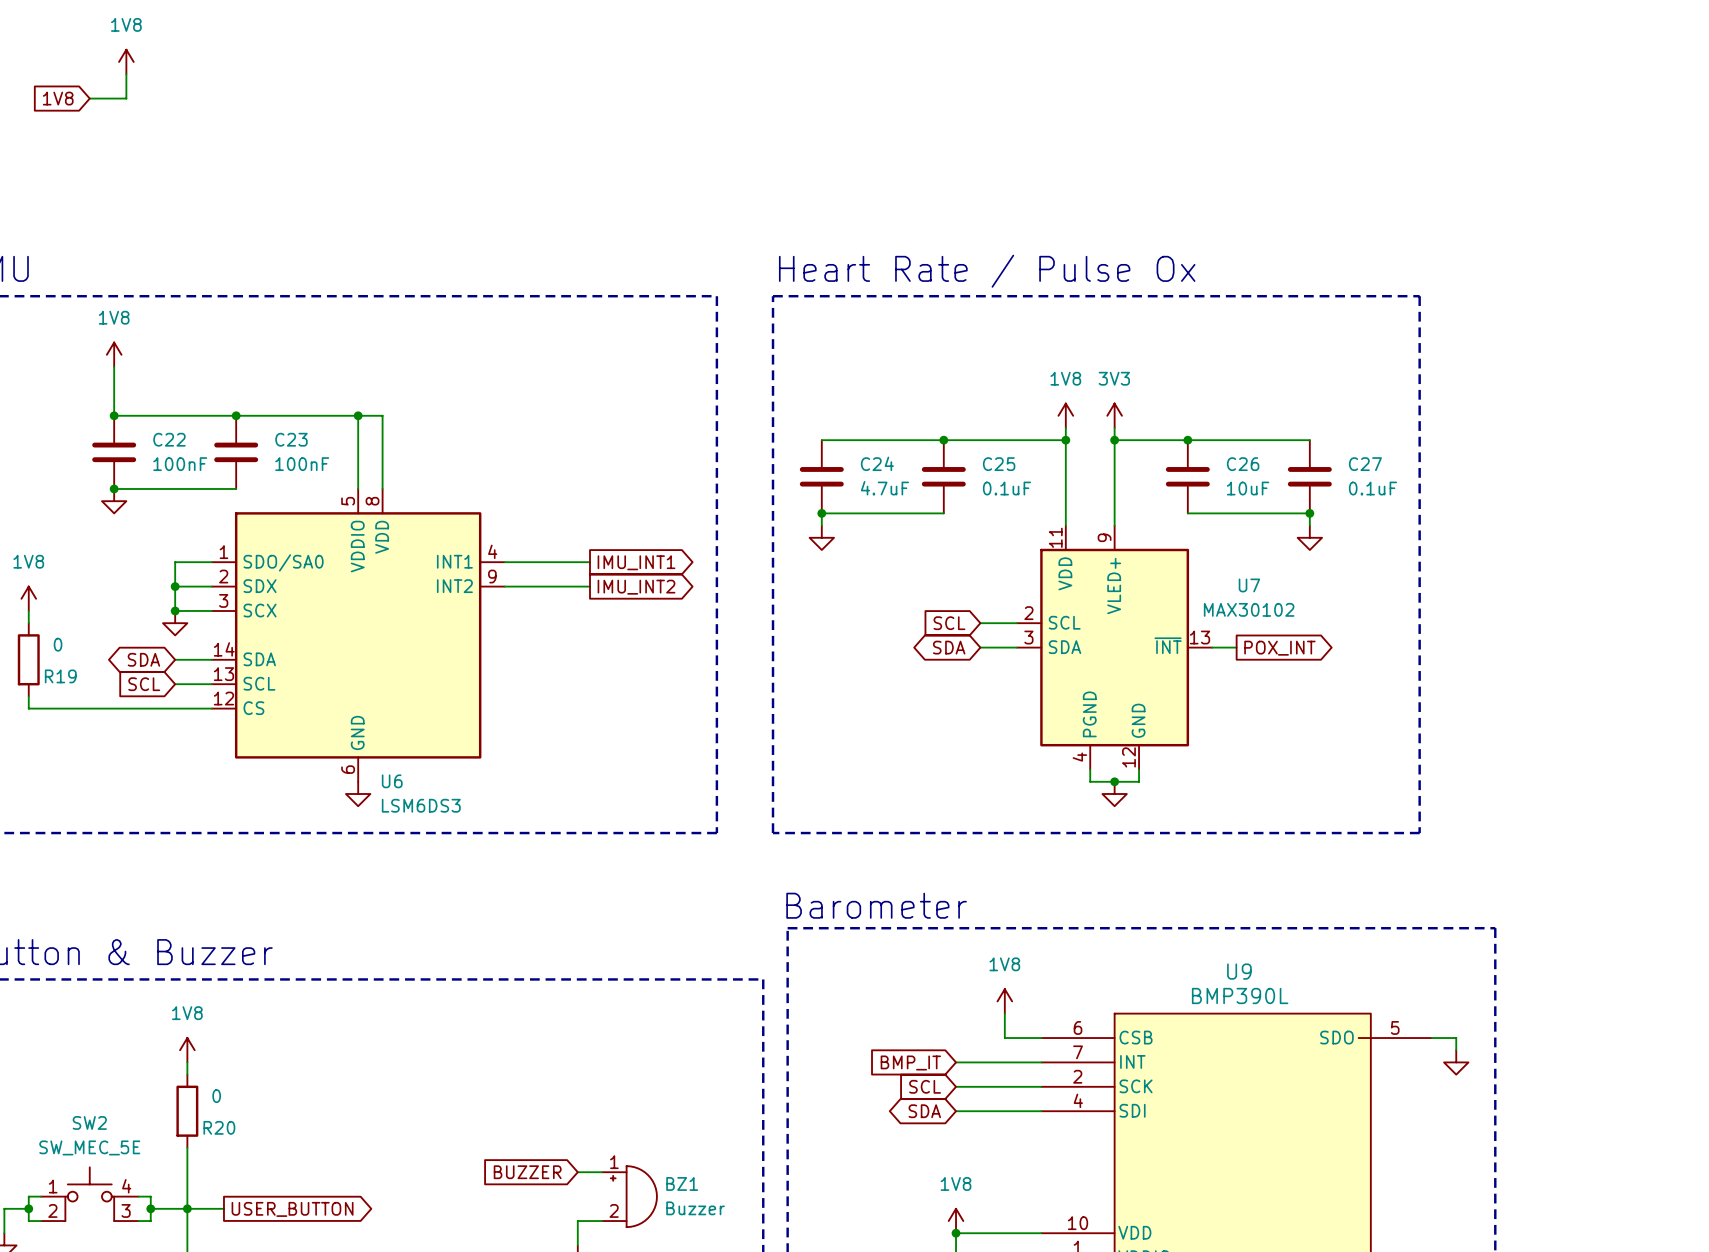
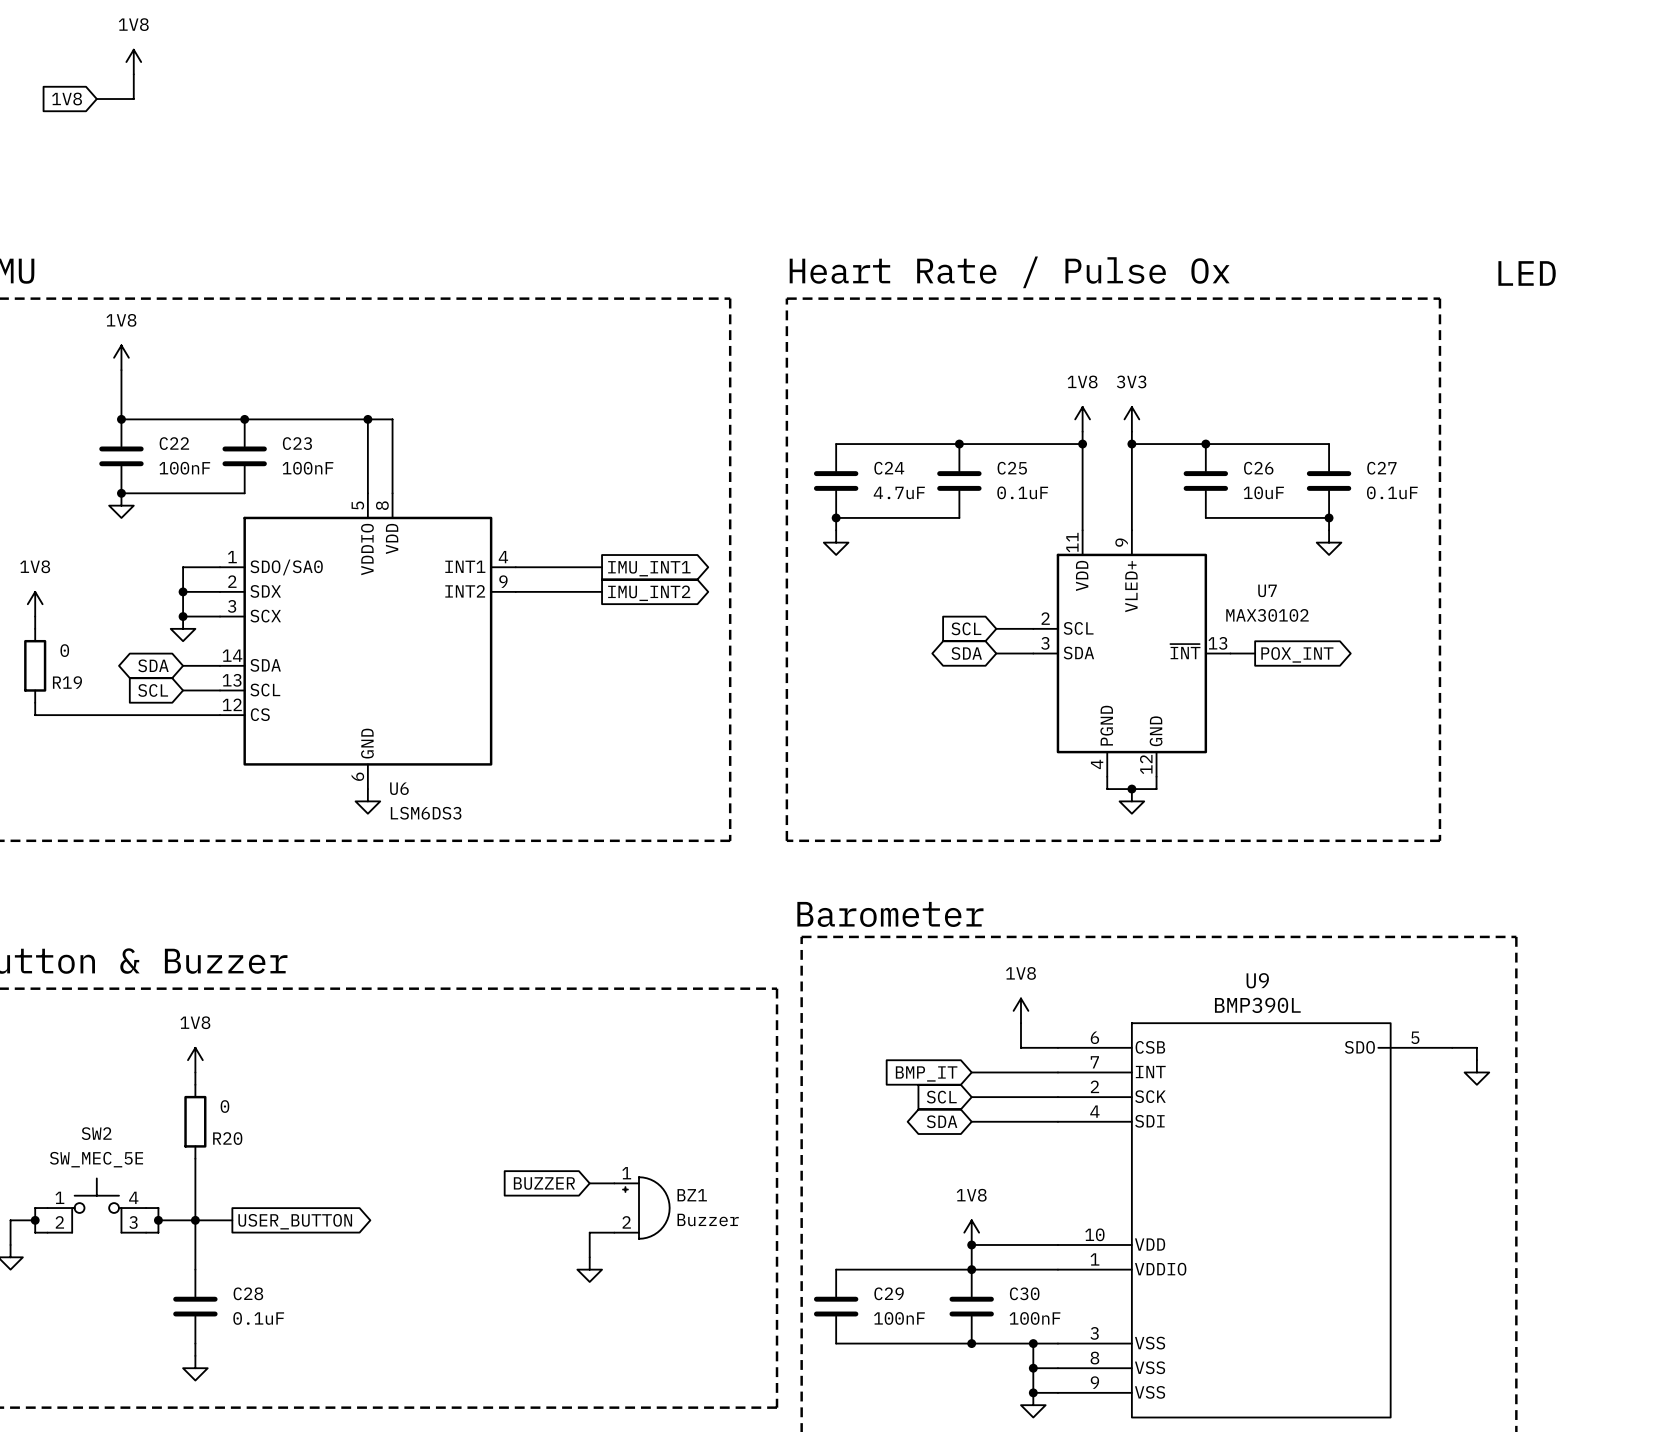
text: none -> LED (1527, 273)

